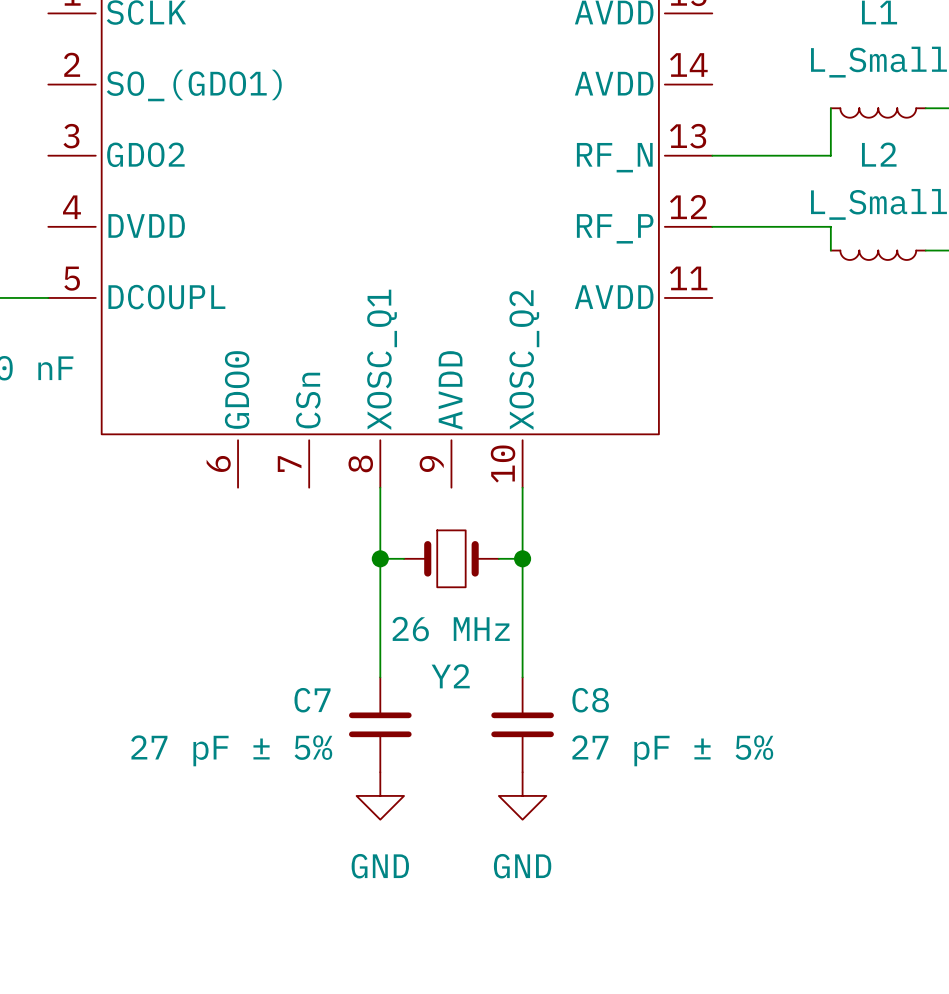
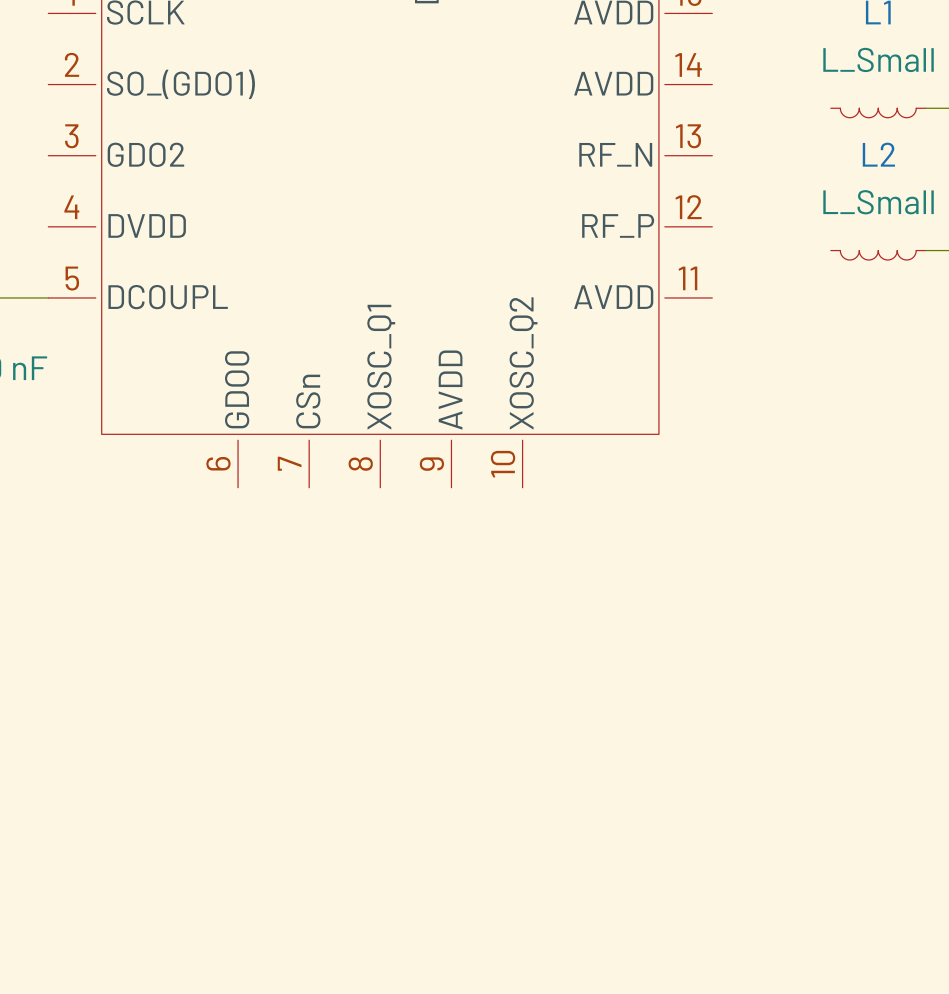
wire: (830, 108) (830, 155) (712, 155) -> none
wire: (712, 226) (830, 226) (830, 250) -> none
wire: (380, 487) (380, 677) -> none
wire: (522, 487) (522, 677) -> none
wire: (380, 558) (404, 558) -> none
junction: (380, 558) -> none
Y2: 26 MHz (451, 558) -> none
wire: (498, 558) (522, 558) -> none
junction: (522, 558) -> none
C7: 27 pF ± 5% (380, 724) -> none
C8: 27 pF ± 5% (522, 724) -> none
power symbol: GND (380, 795) -> none
power symbol: GND (522, 795) -> none

